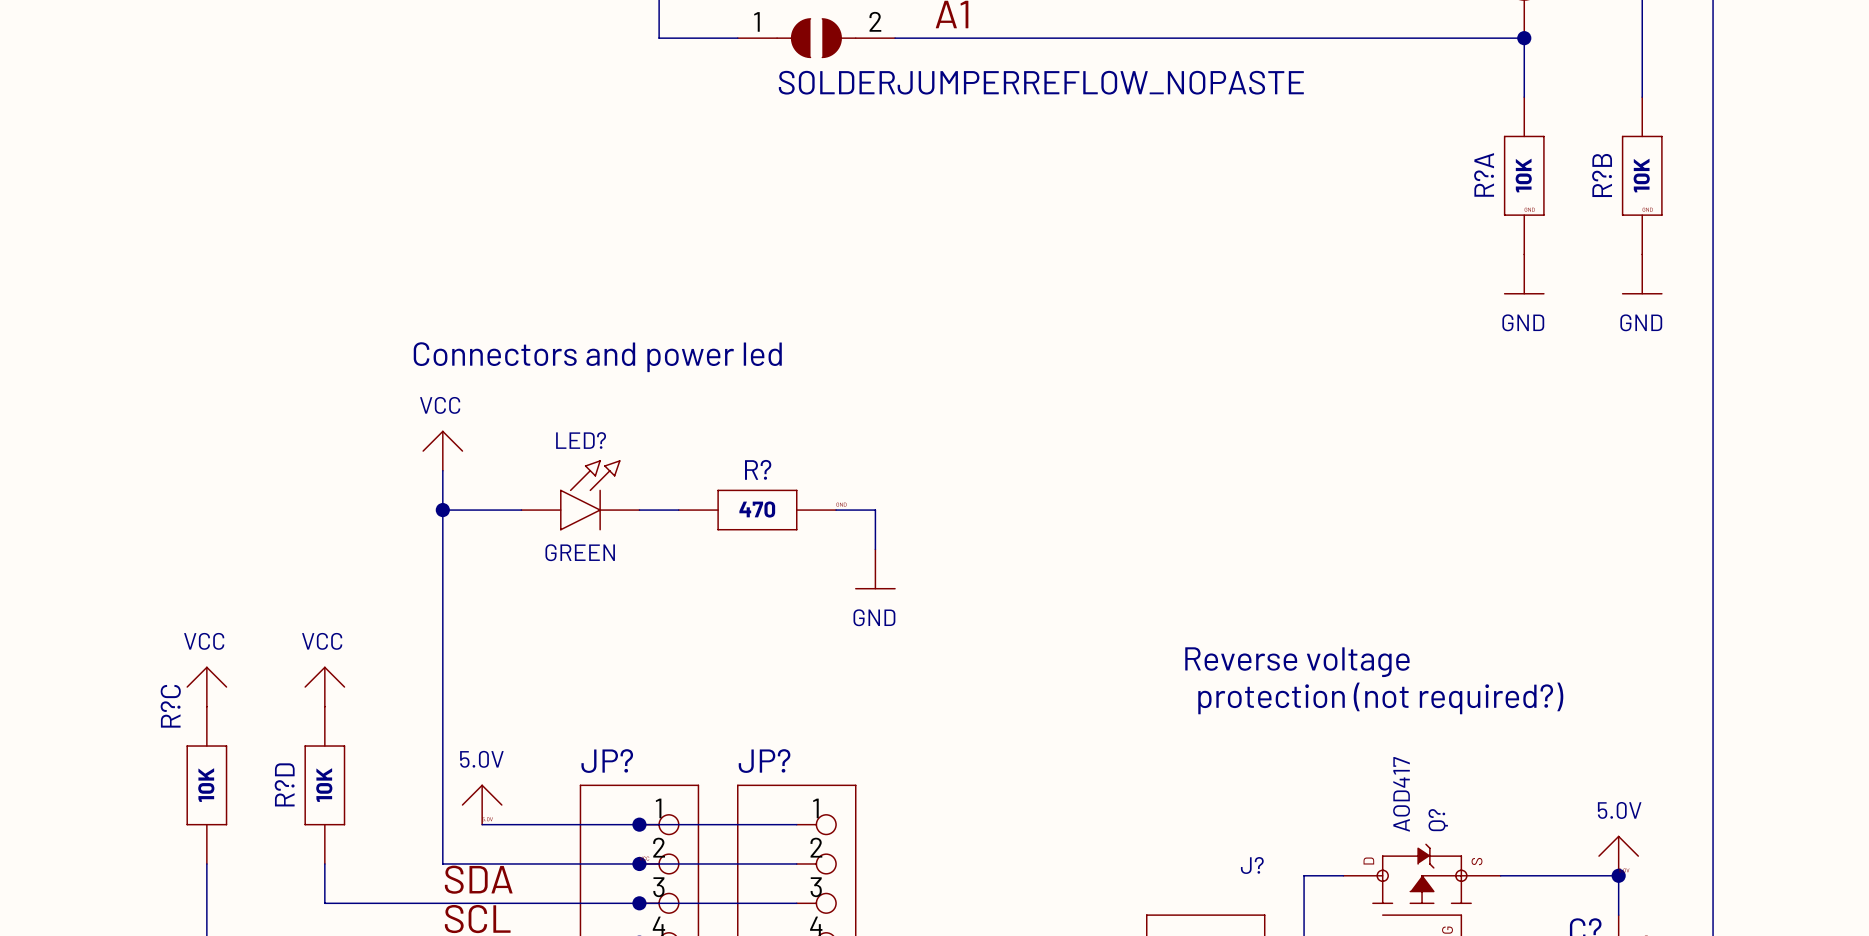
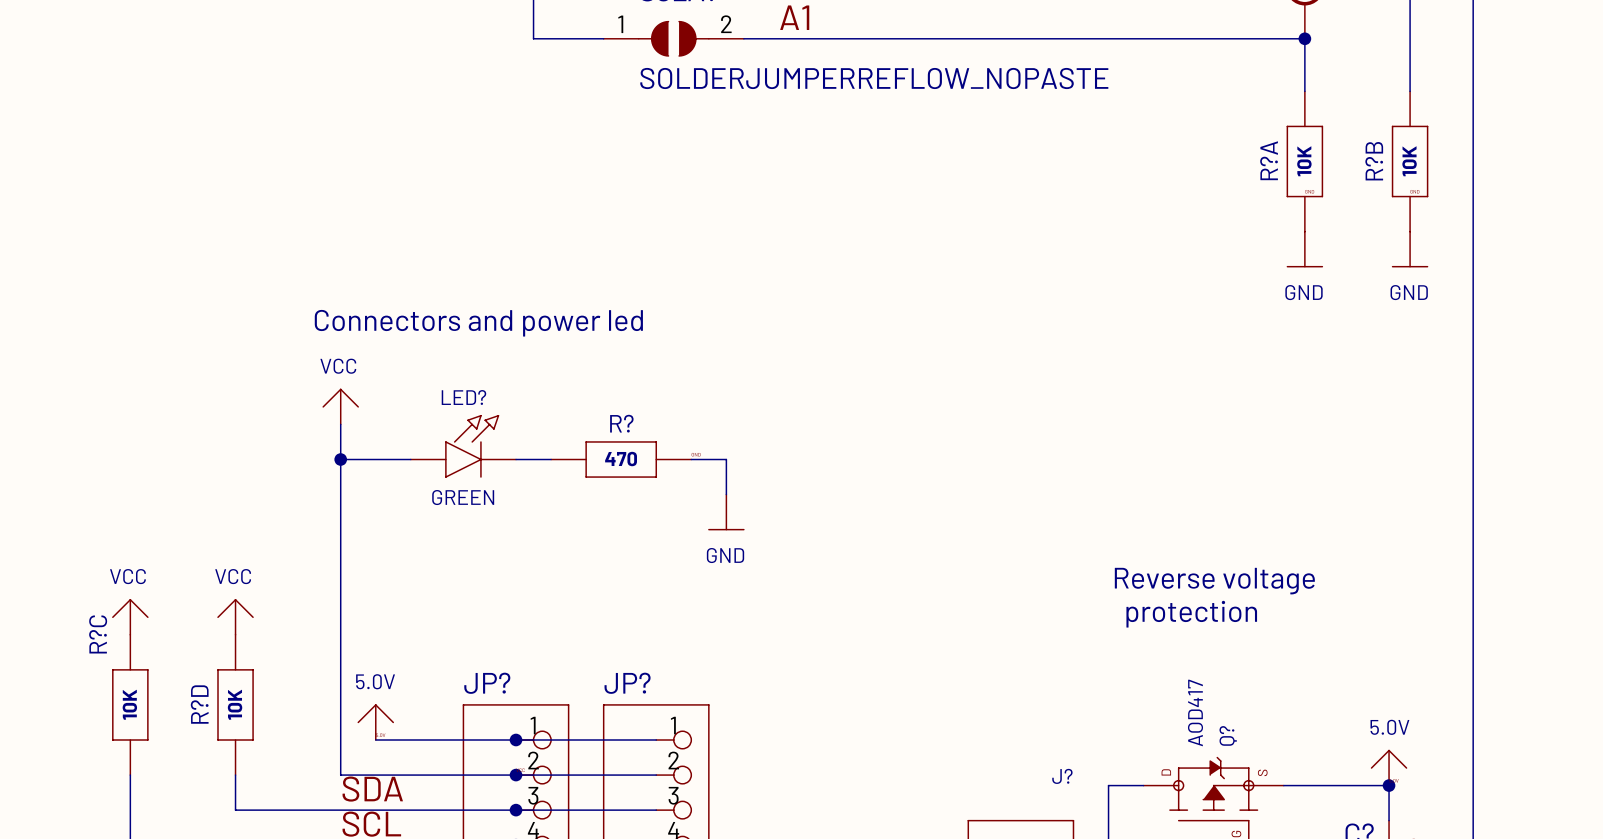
text position: Reverse voltage (1297, 662) -> Reverse voltage (1214, 581)
text: none -> protection (1191, 614)
text: protection (not required?) (1380, 698) -> none

